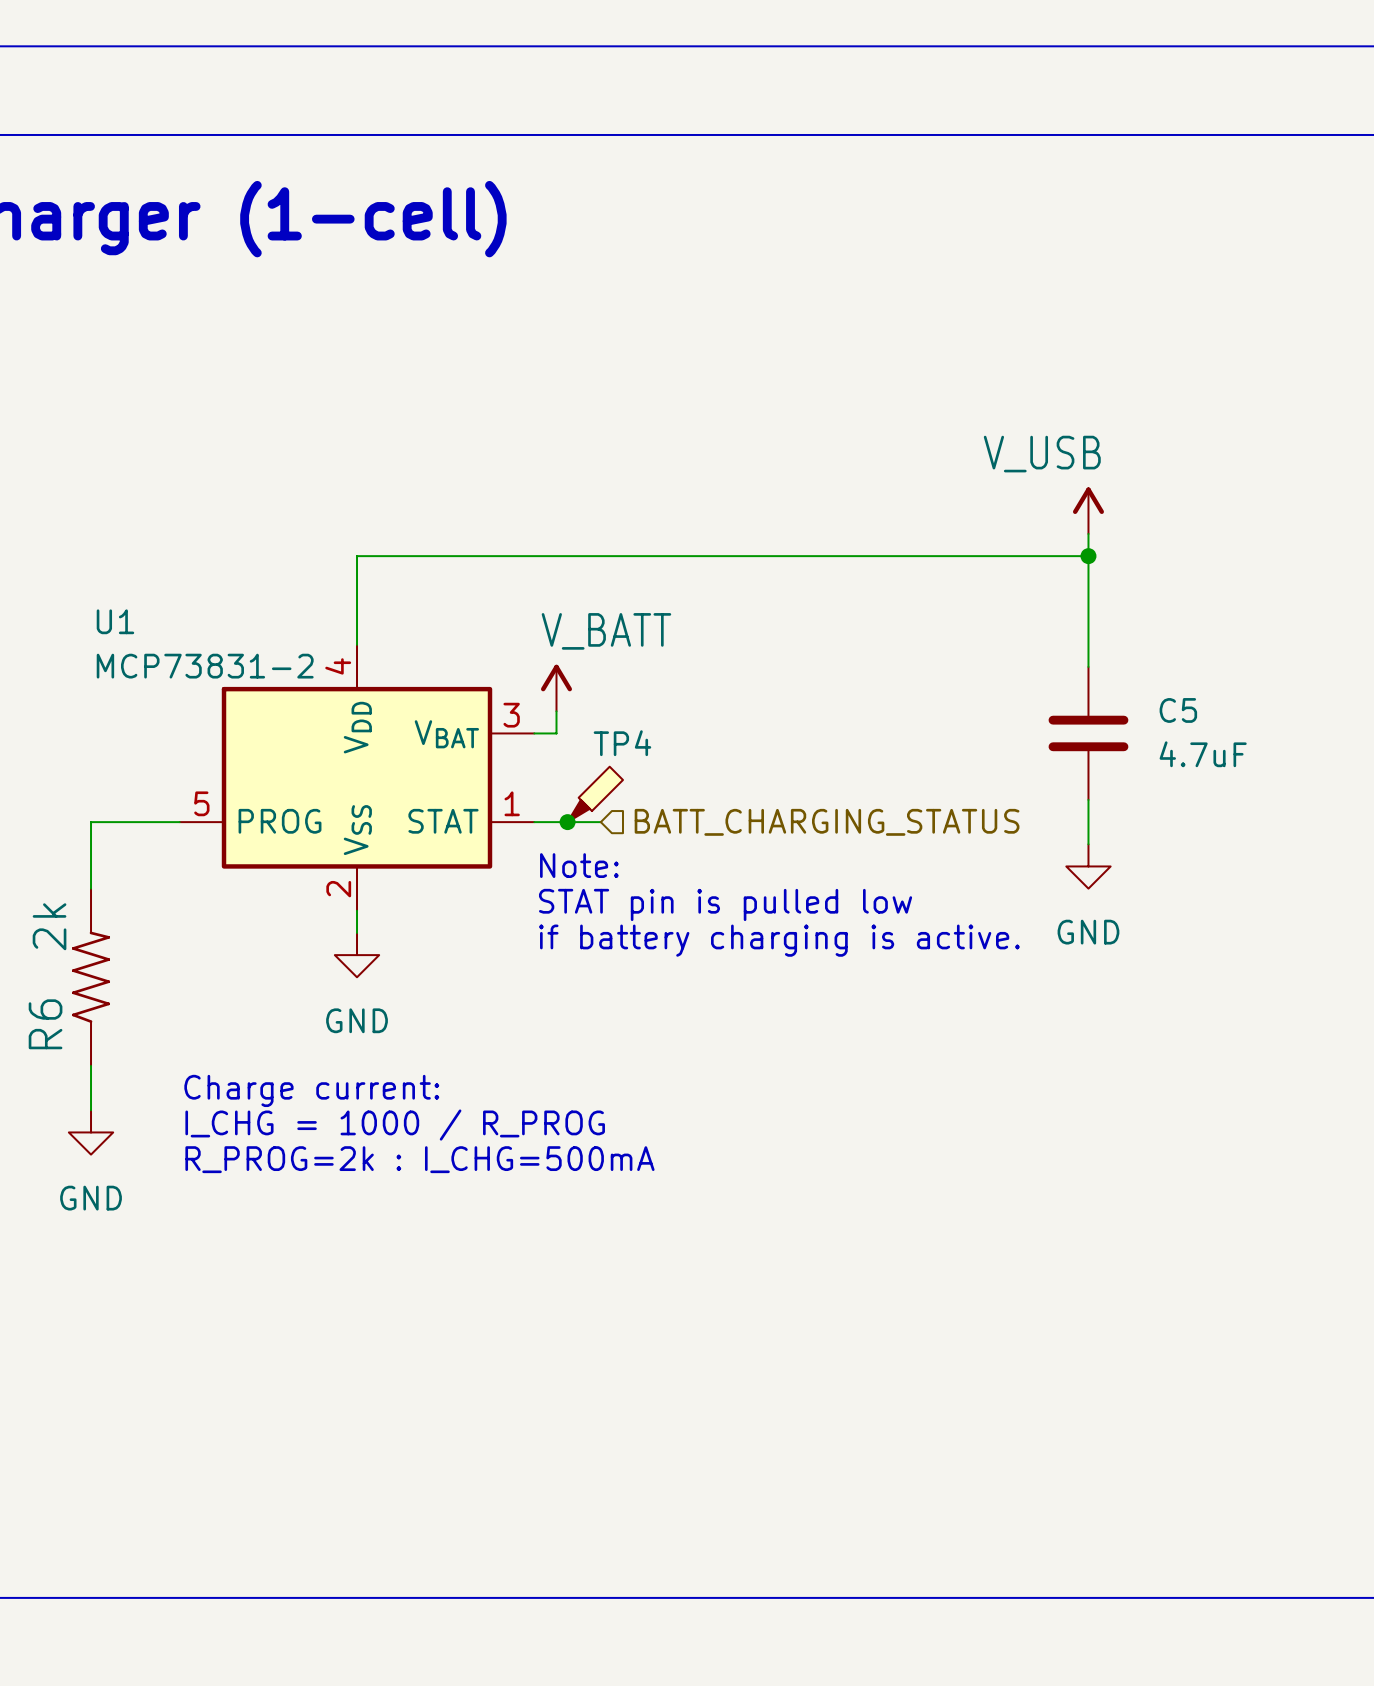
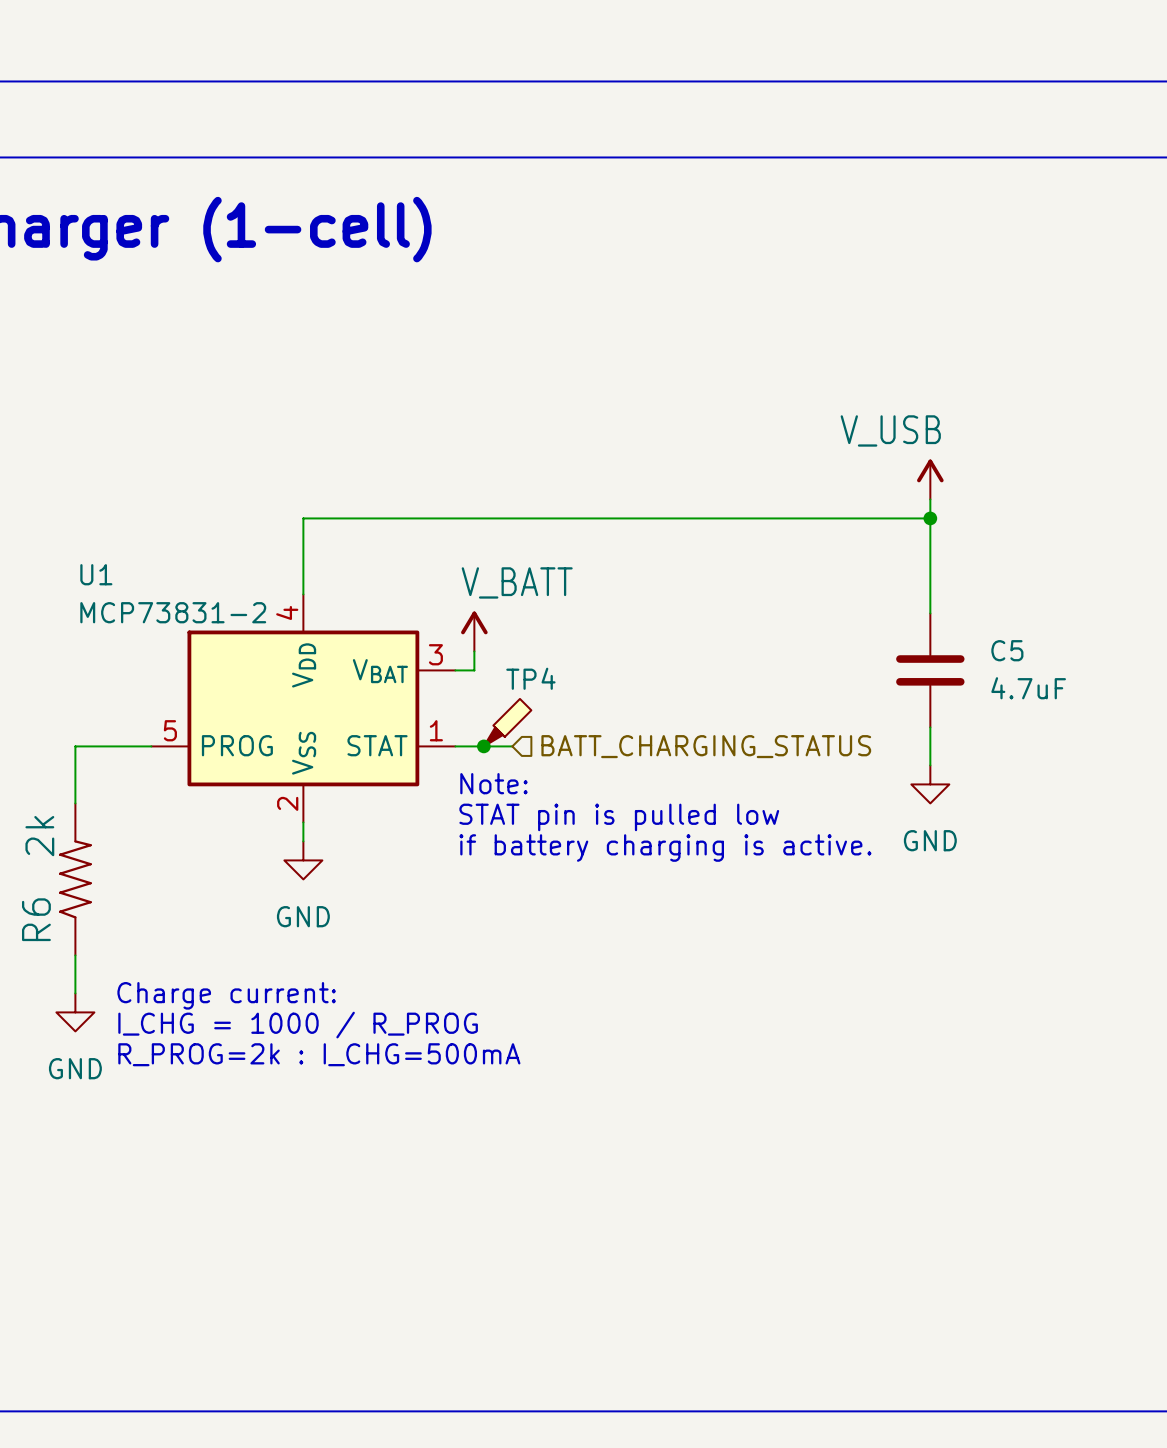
text position: Charge current: (311, 1090) -> Charge current: (226, 995)
text position: I_CHG = 1000 / R_PROG (395, 1125) -> I_CHG = 1000 / R_PROG (298, 1025)
text position: R_PROG=2k : I_CHG=500mA (419, 1159) -> R_PROG=2k : I_CHG=500mA (319, 1054)

